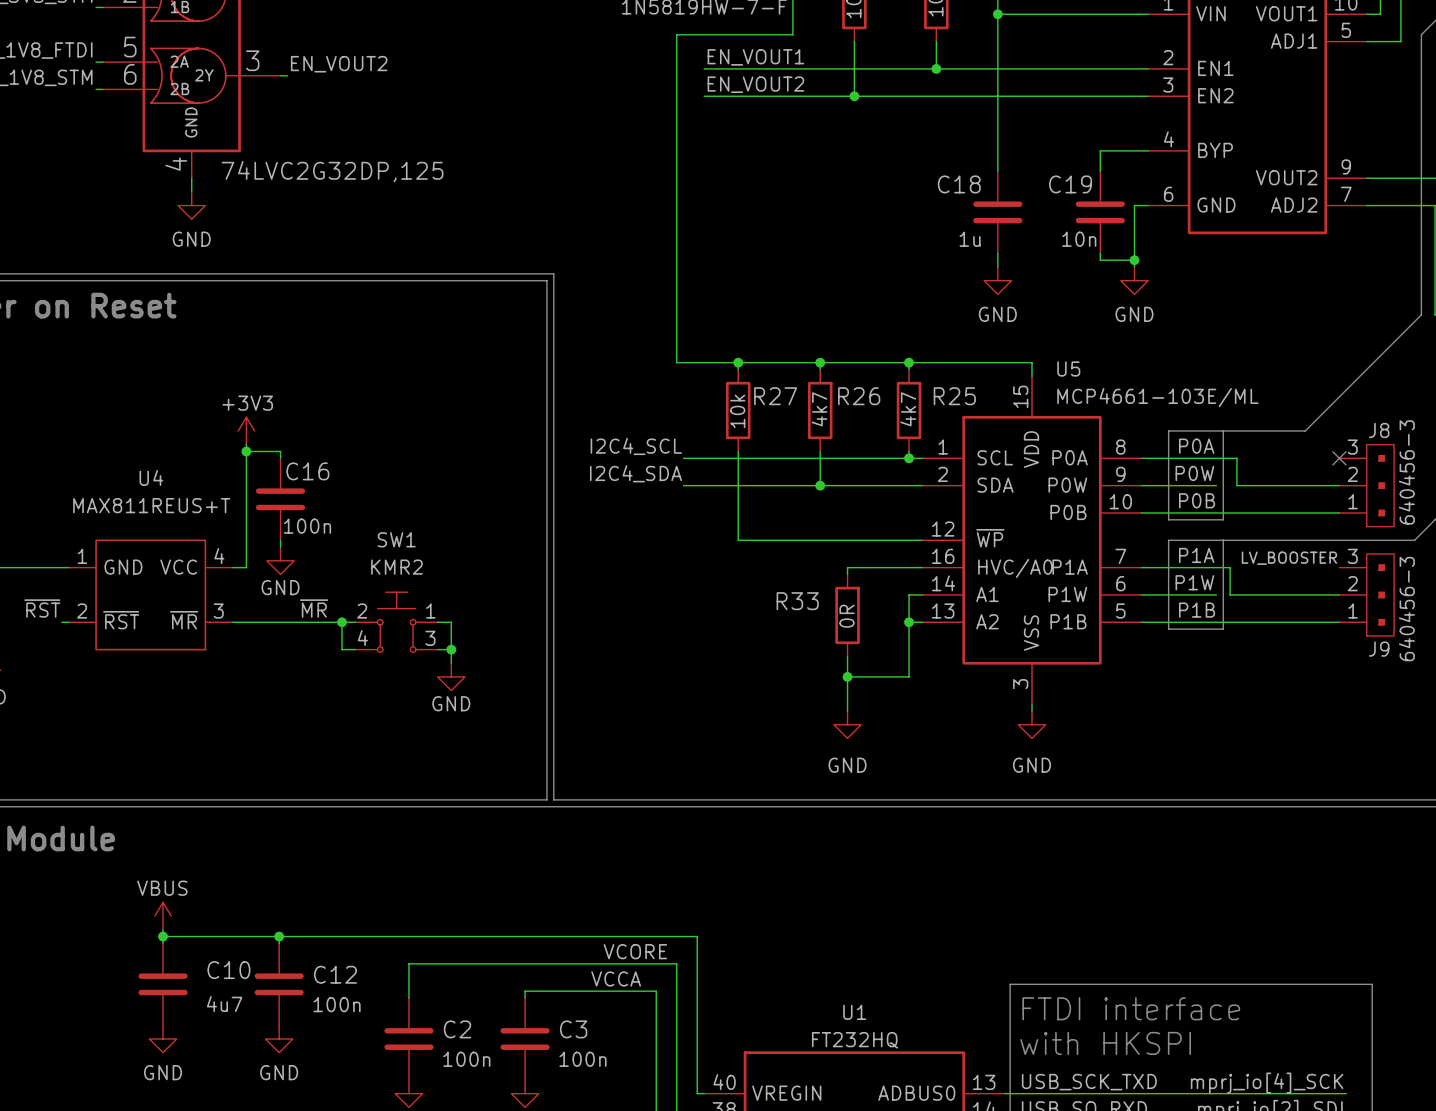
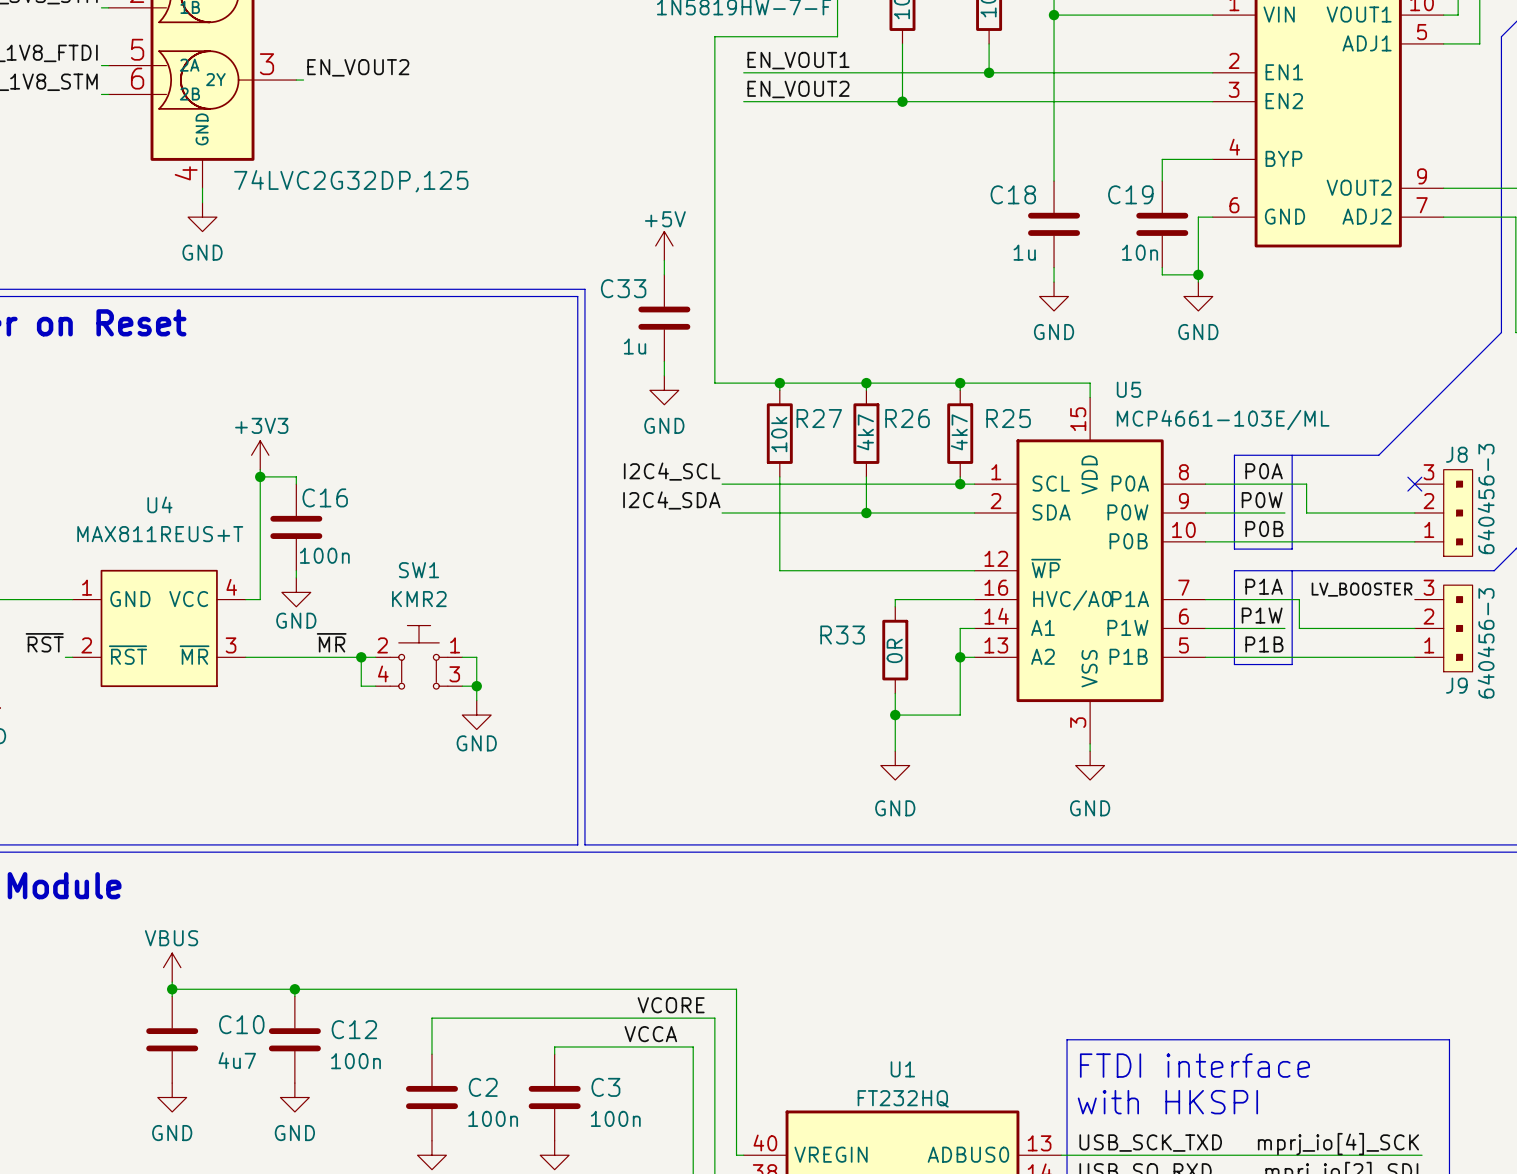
power symbol: none -> +5V (664, 246)
wire: none -> (664, 260) (664, 274)
C33: none -> (664, 318)
wire: none -> (664, 361) (664, 375)
power symbol: none -> GND (664, 390)

